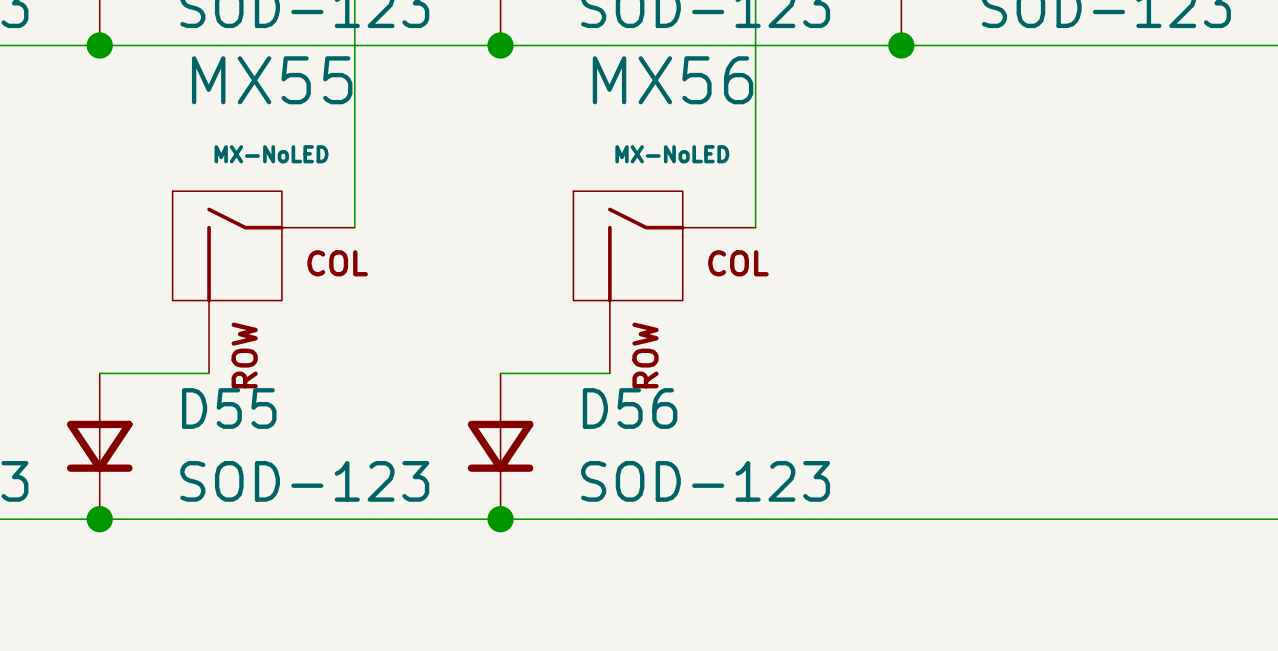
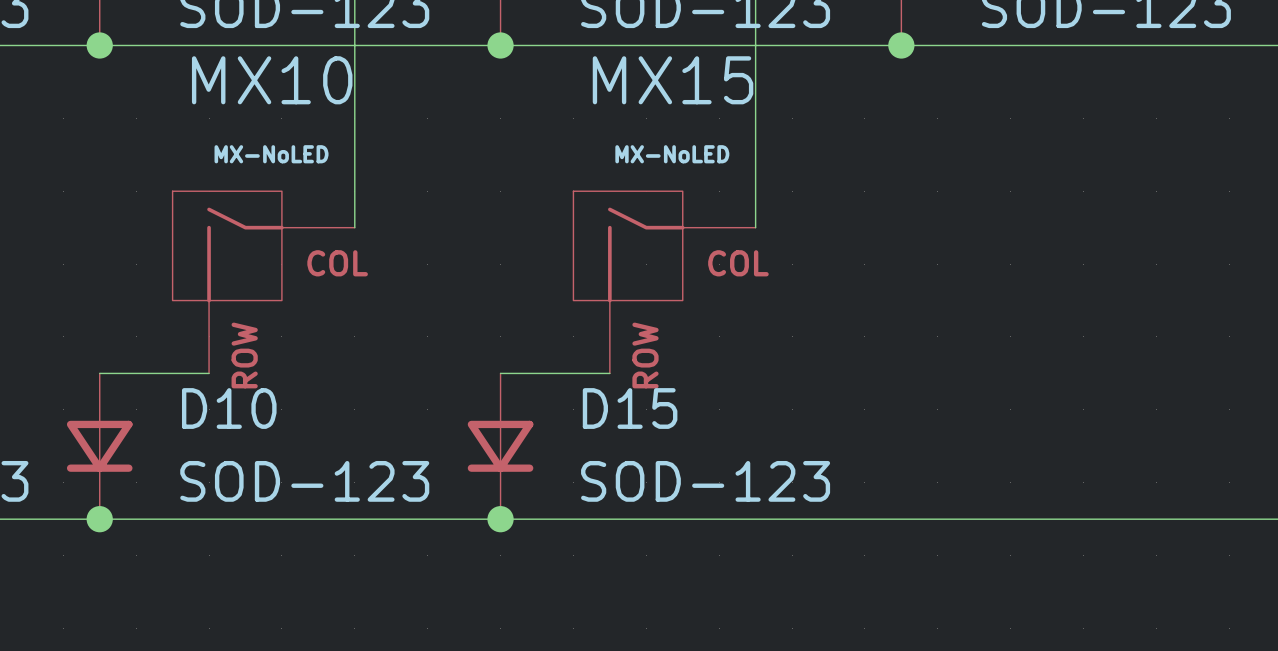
MX55 name: MX55 (272, 80) -> MX10 (272, 80)
MX56 name: MX56 (673, 80) -> MX15 (673, 80)
D55 name: D55 (229, 408) -> D10 (229, 408)
D56 name: D56 (630, 408) -> D15 (630, 408)

